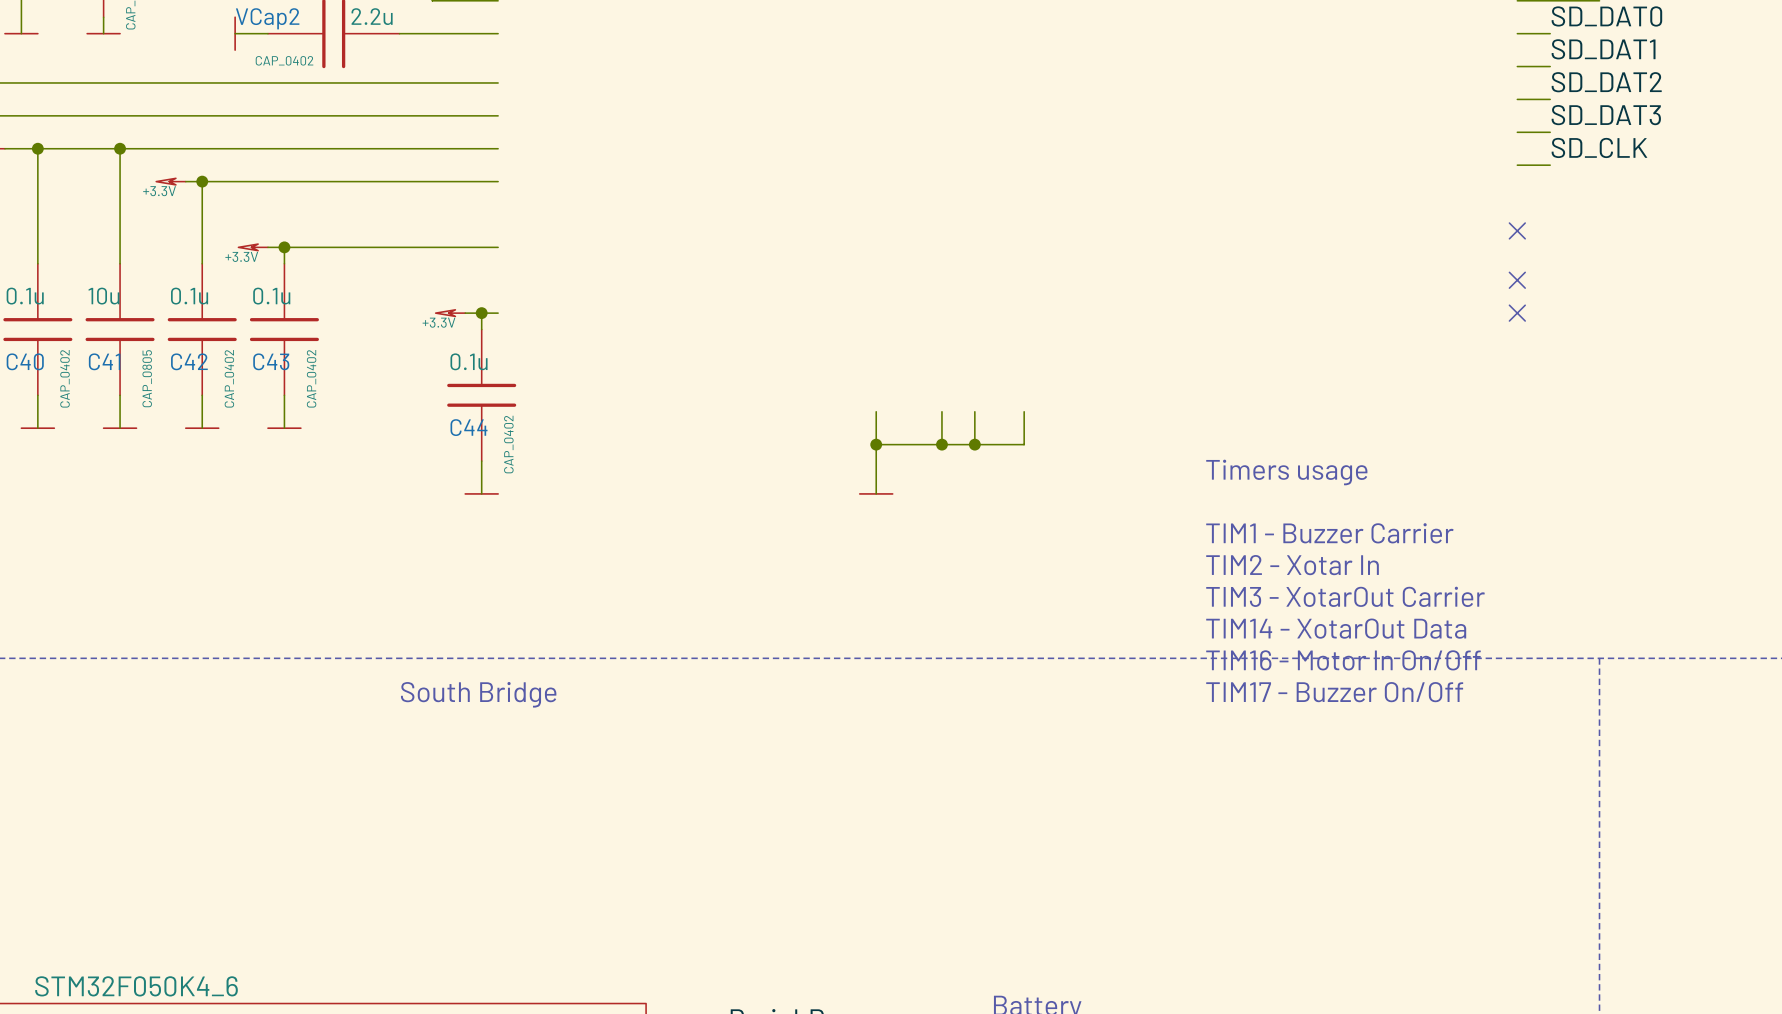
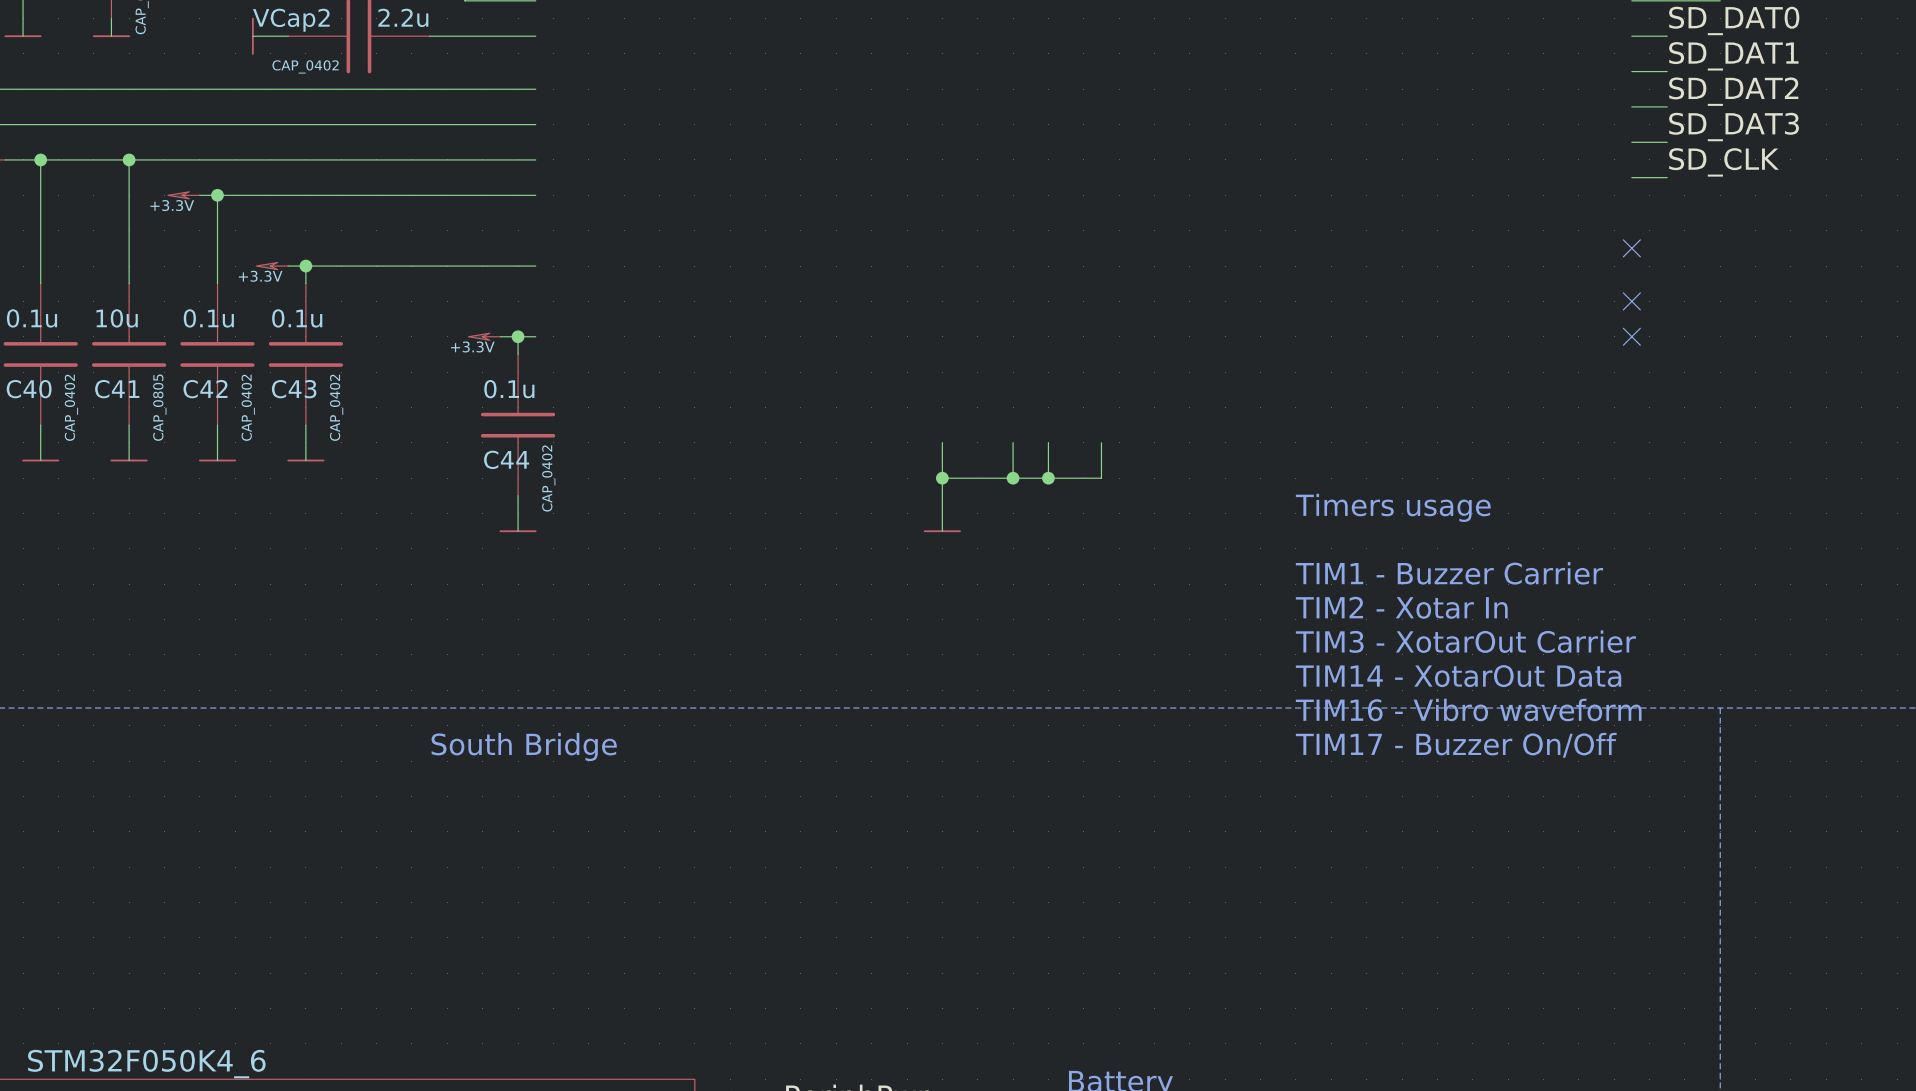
text: TIM16 - Motor In On/Off (1343, 660) -> TIM16 - Vibro waveform (1468, 709)

